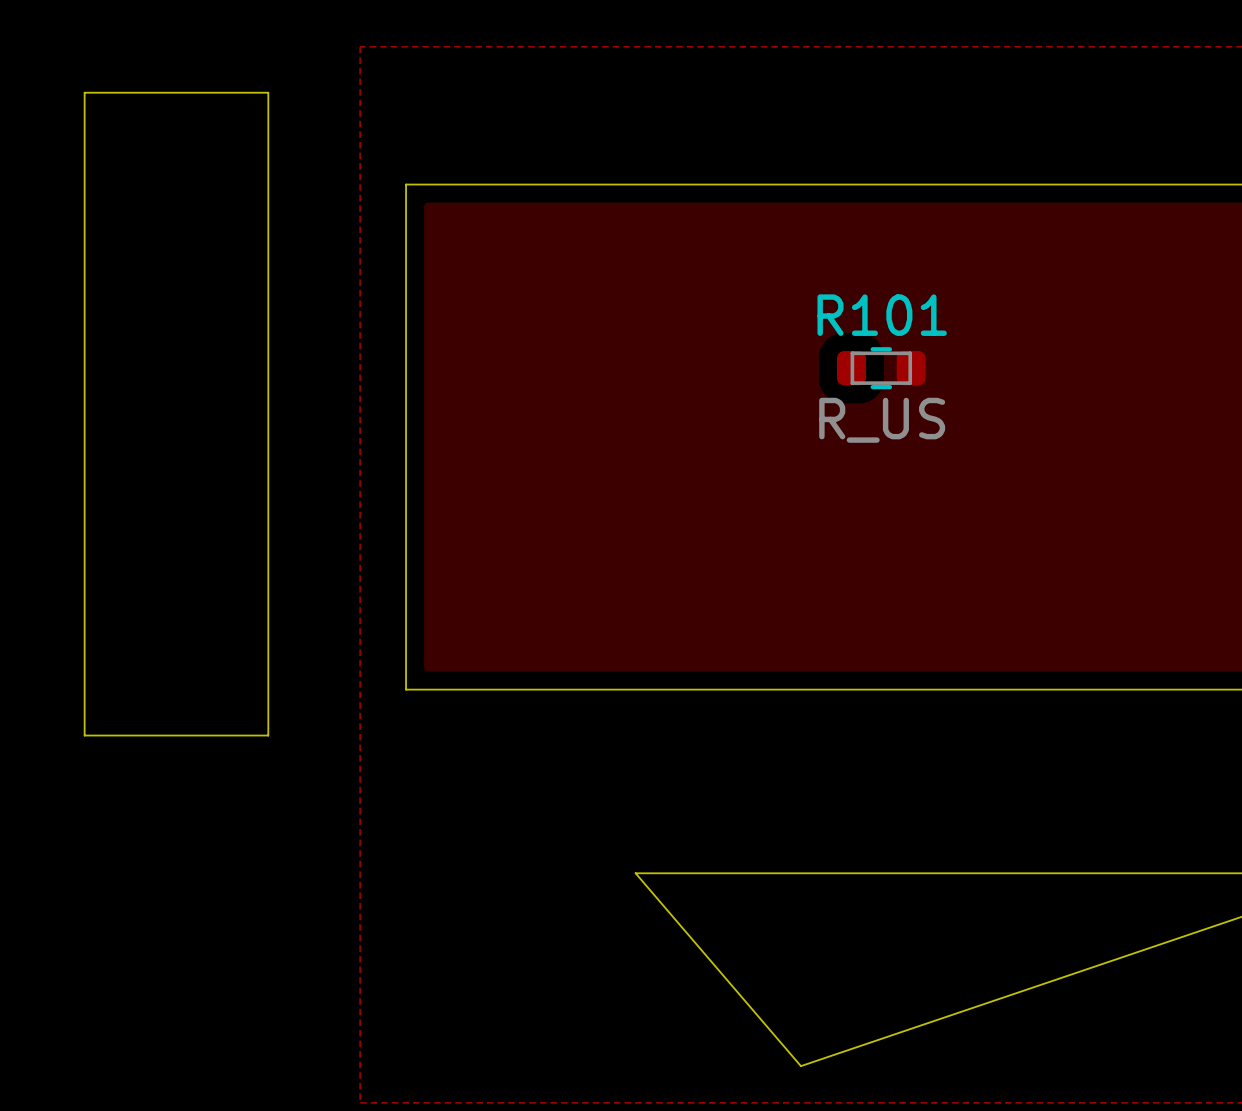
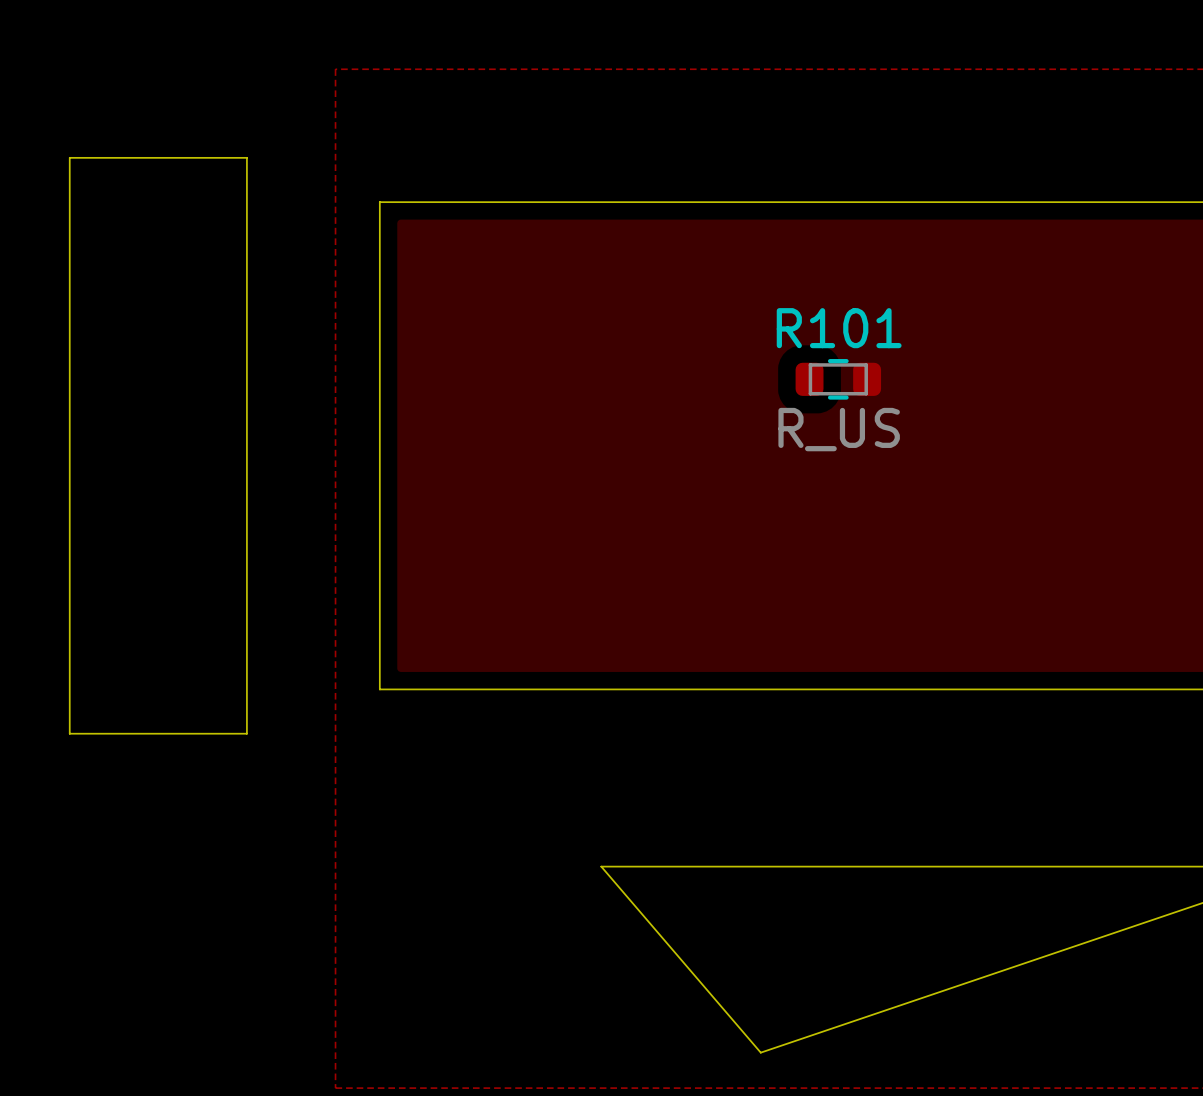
board edge: (84, 138) (84, 92) (268, 92) (268, 138) -> (69, 157) (246, 157)

